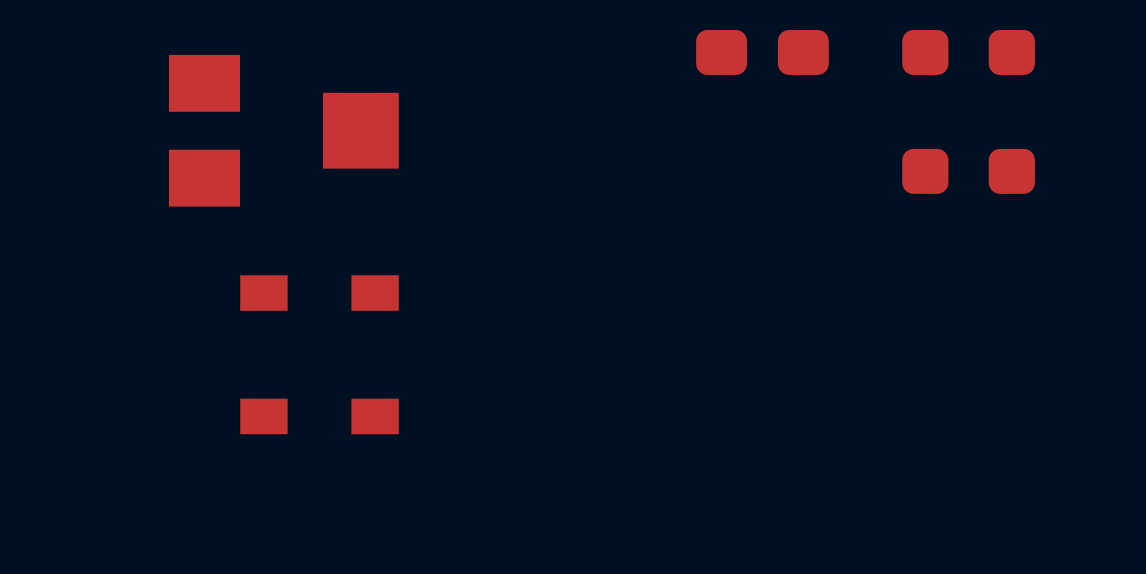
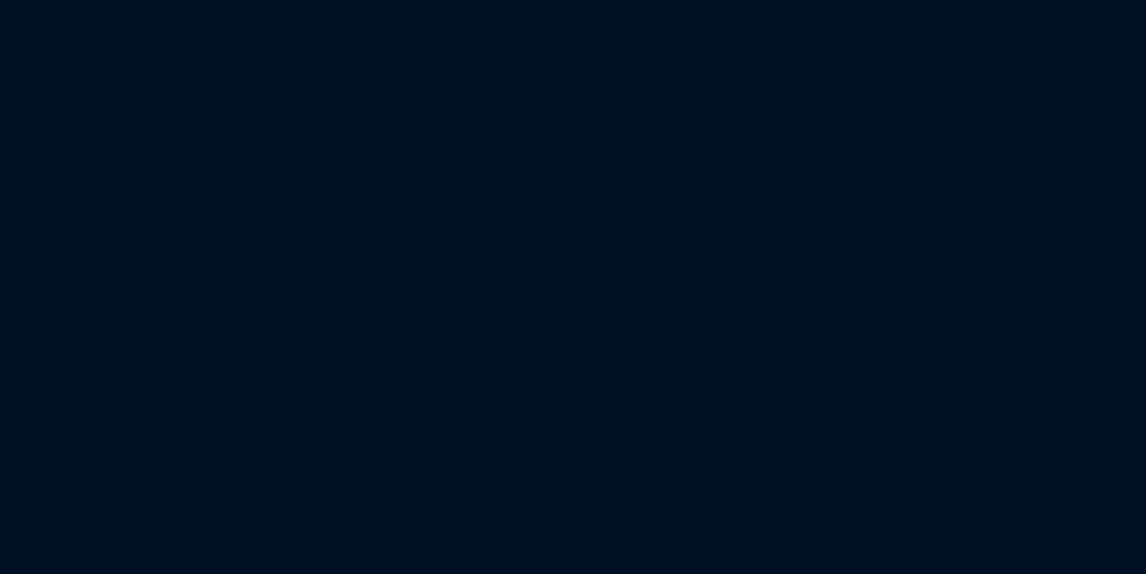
part: (762, 52) -> none
part: (968, 52) -> none
part: (283, 130) -> none
part: (968, 171) -> none
part: (319, 293) -> none
part: (319, 416) -> none

